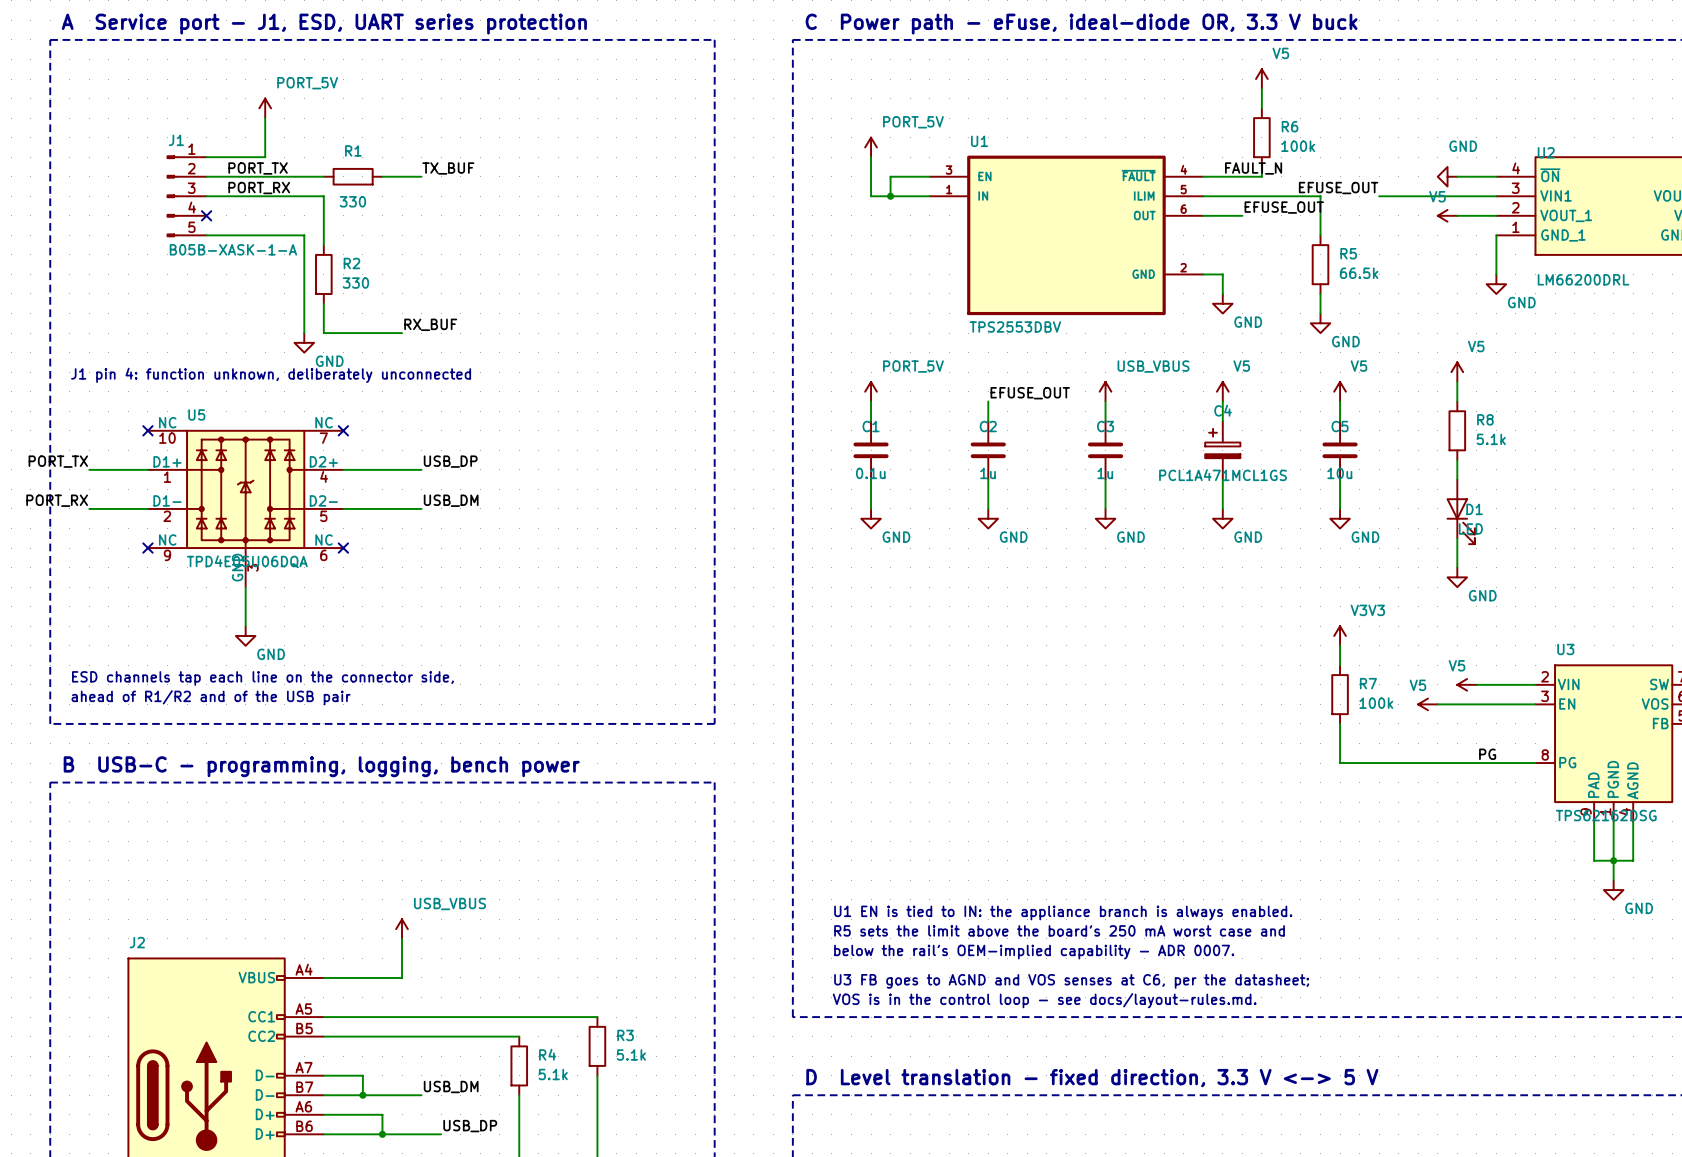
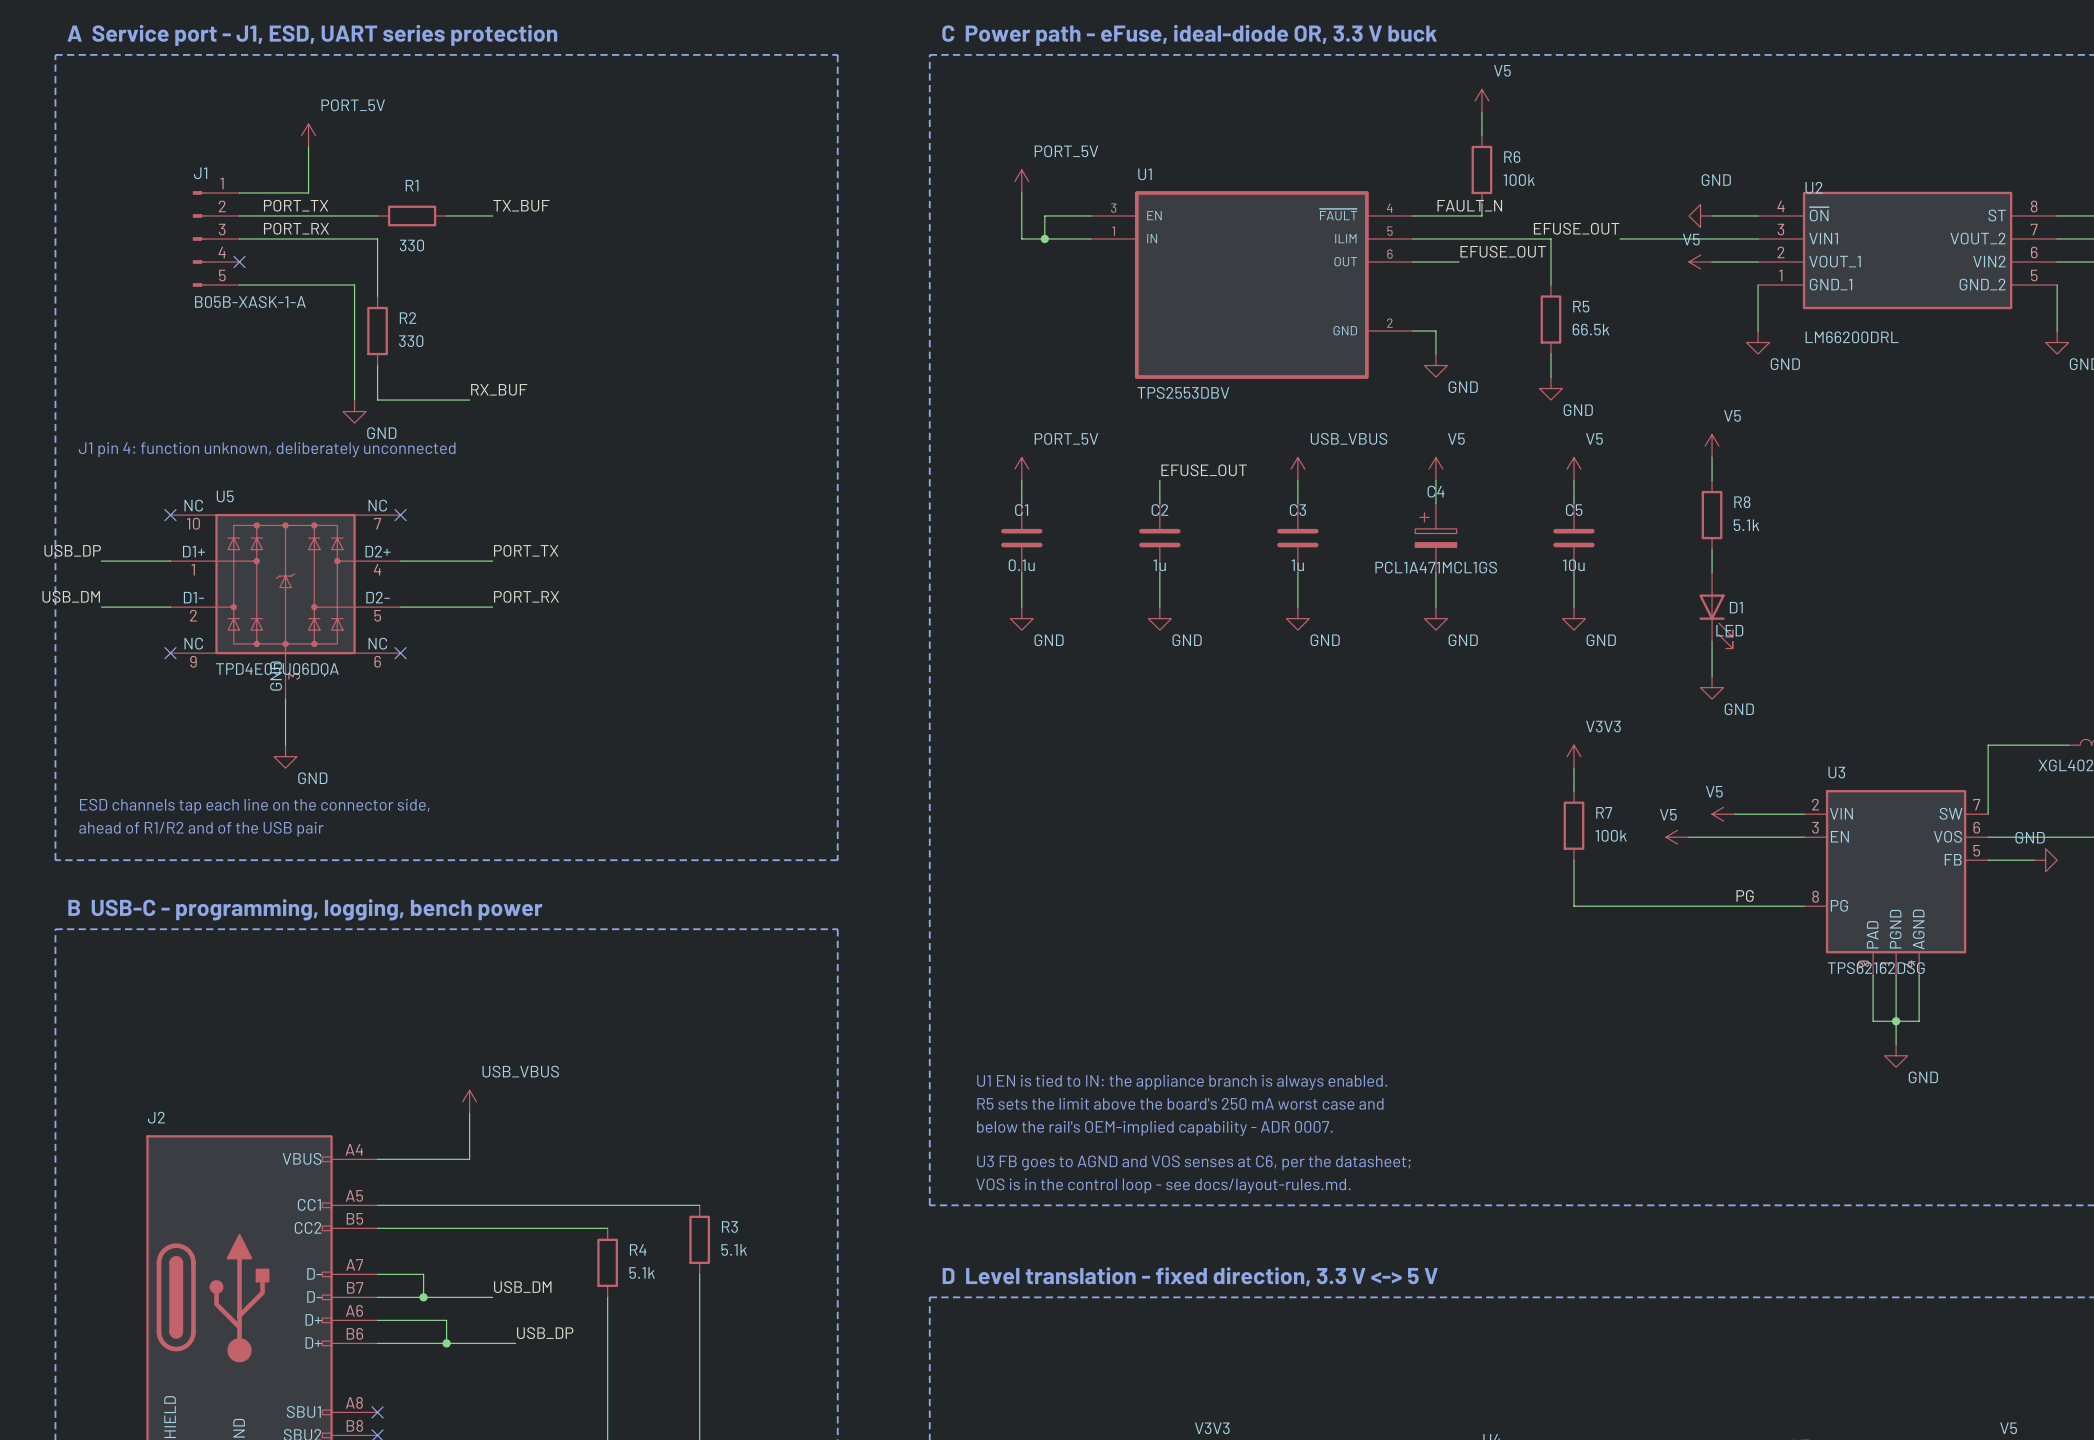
label: PORT_TX (58, 461) -> USB_DP (72, 550)
label: USB_DP (450, 461) -> PORT_TX (526, 550)
label: PORT_RX (57, 500) -> USB_DM (71, 596)
label: USB_DM (451, 500) -> PORT_RX (526, 596)

